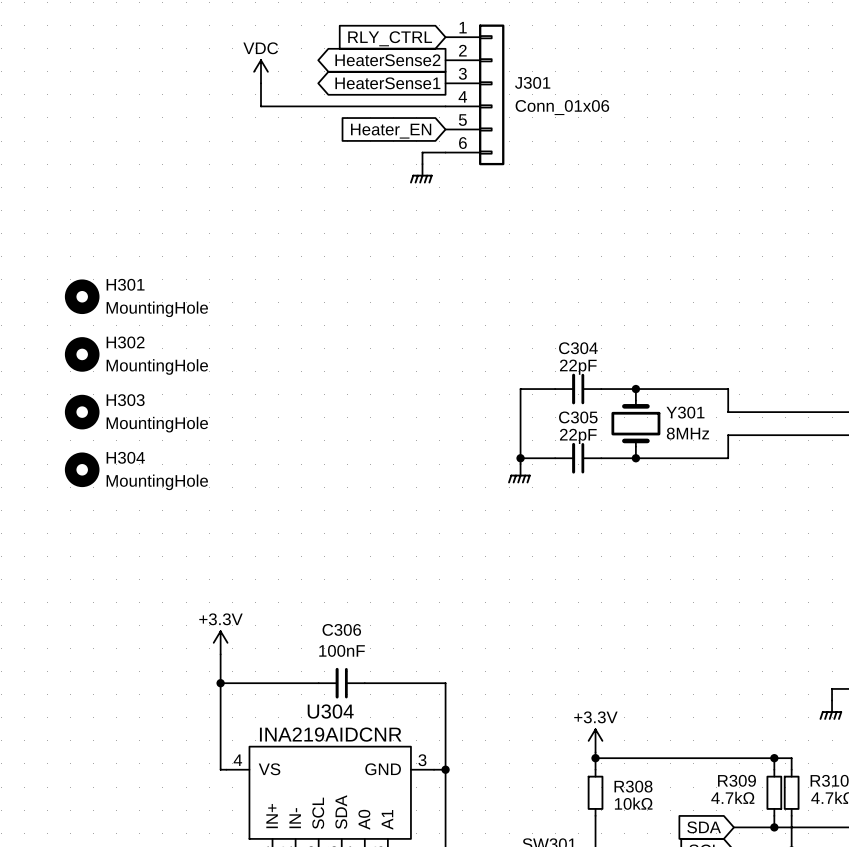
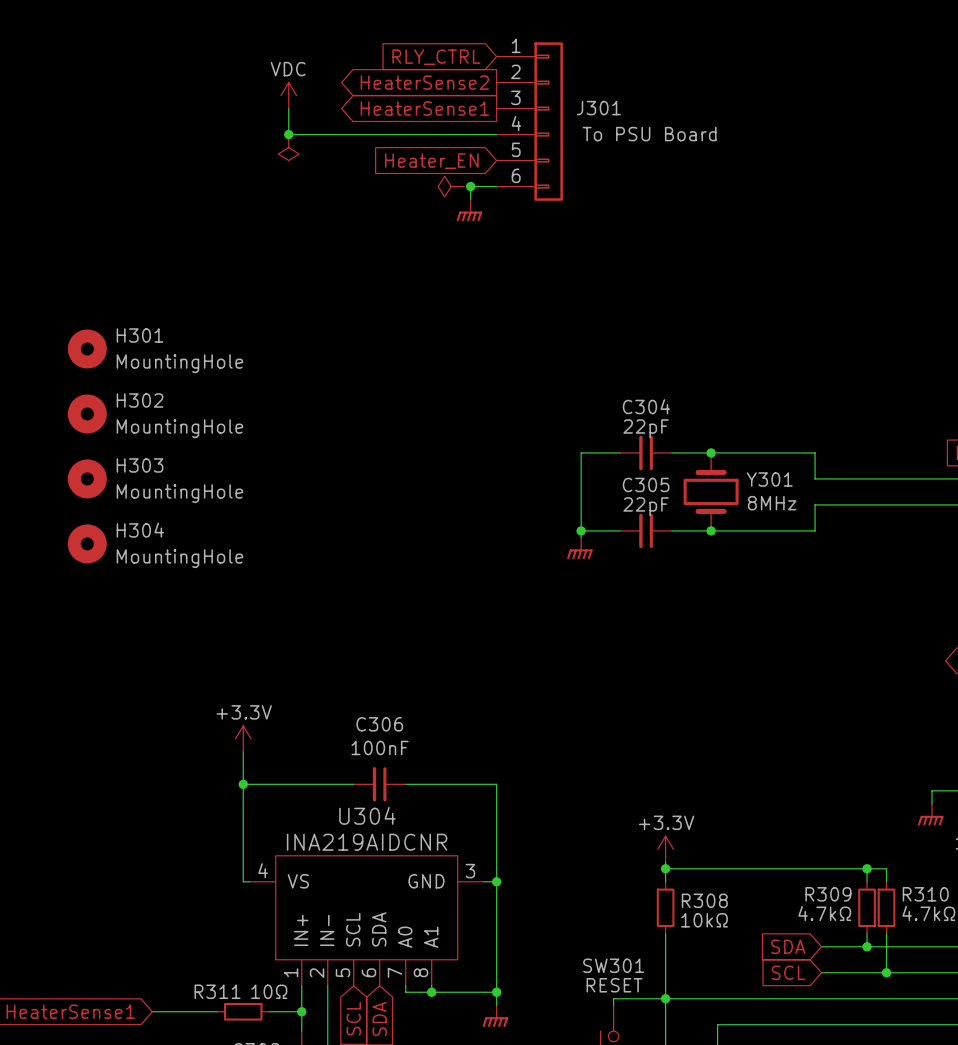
junction: none -> (288, 134)
J301 value: Conn_01x06 (562, 107) -> To PSU Board (649, 134)
power symbol: none -> (288, 147)
power symbol: none -> (451, 186)
junction: none -> (470, 186)

